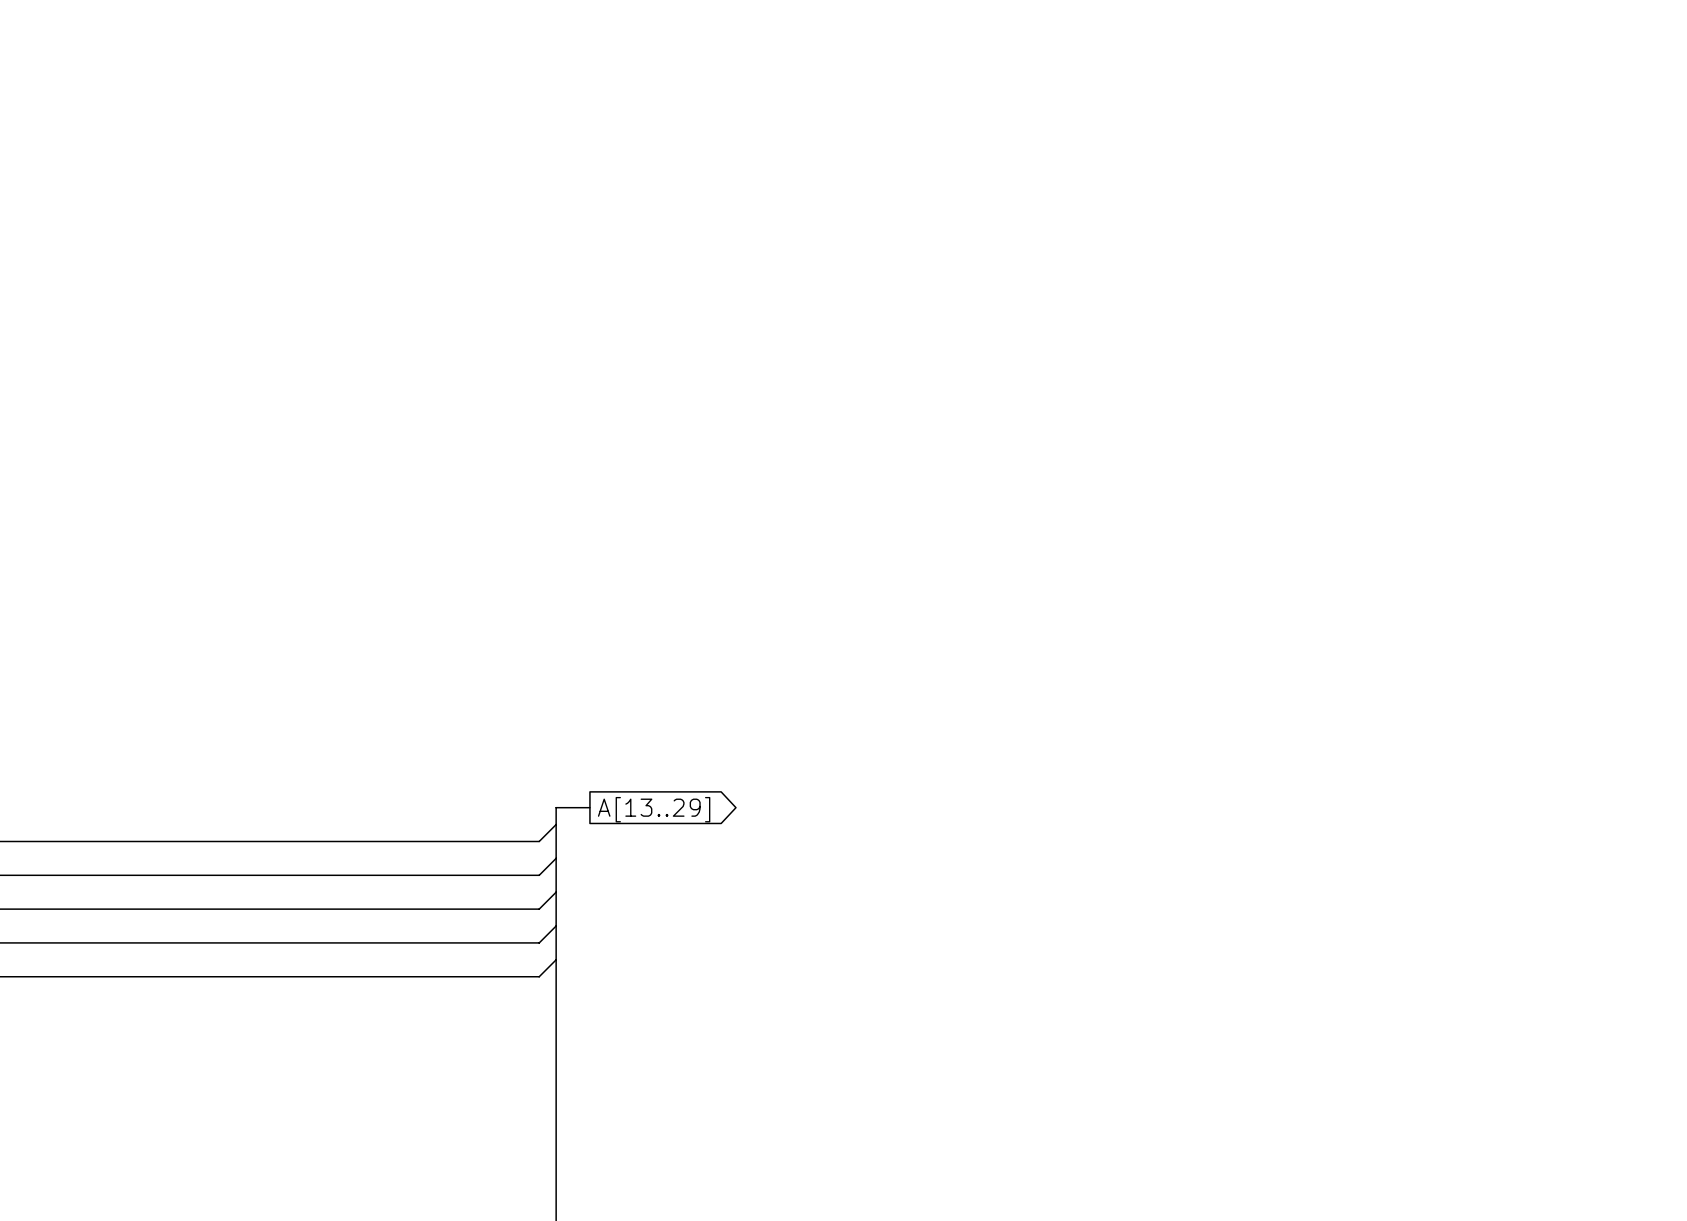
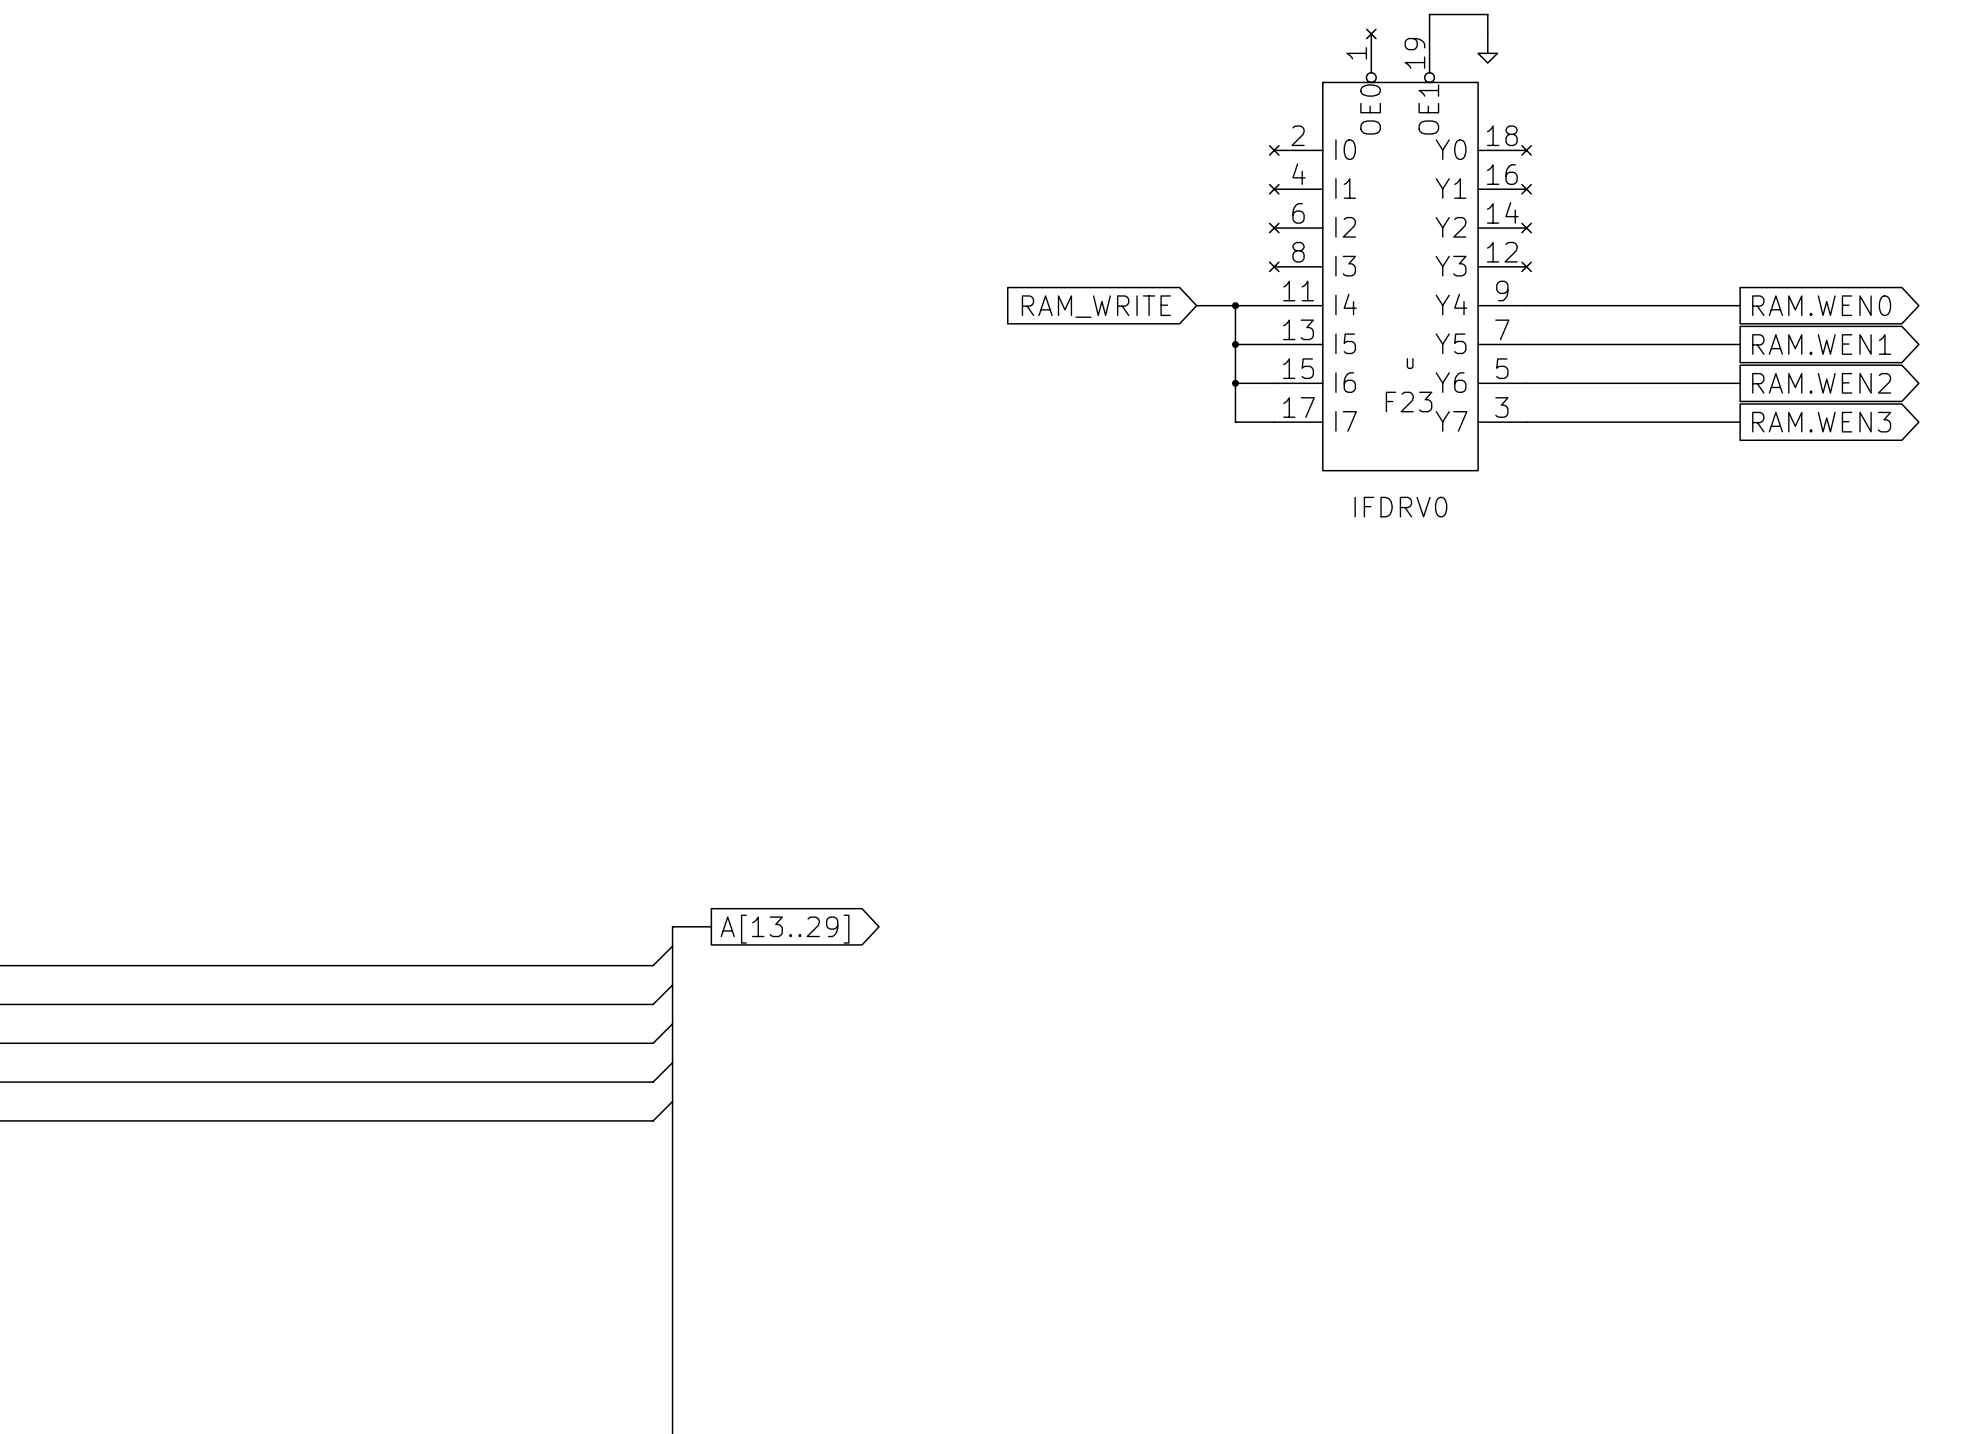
no-connect mark: none -> (1371, 33)
wire: none -> (1429, 33) (1429, 14) (1487, 14) (1487, 33)
power symbol: none -> (1487, 48)
no-connect mark: none -> (1274, 150)
no-connect mark: none -> (1526, 150)
no-connect mark: none -> (1274, 189)
no-connect mark: none -> (1526, 189)
no-connect mark: none -> (1274, 228)
no-connect mark: none -> (1526, 228)
U: none -> (1400, 252)
no-connect mark: none -> (1274, 266)
no-connect mark: none -> (1526, 266)
wire: none -> (1196, 305) (1274, 305)
wire: none -> (1235, 305) (1235, 422) (1274, 422)
junction: none -> (1235, 305)
wire: none -> (1526, 305) (1740, 305)
global label: none -> RAM.WEN0 (1821, 305)
global label: none -> RAM_WRITE (1096, 306)
wire: none -> (1235, 344) (1274, 344)
junction: none -> (1235, 344)
wire: none -> (1526, 344) (1740, 344)
global label: none -> RAM.WEN1 (1821, 344)
wire: none -> (1235, 383) (1274, 383)
junction: none -> (1235, 383)
wire: none -> (1526, 383) (1740, 383)
global label: none -> RAM.WEN2 (1821, 383)
wire: none -> (1526, 422) (1740, 422)
global label: none -> RAM.WEN3 (1821, 422)

